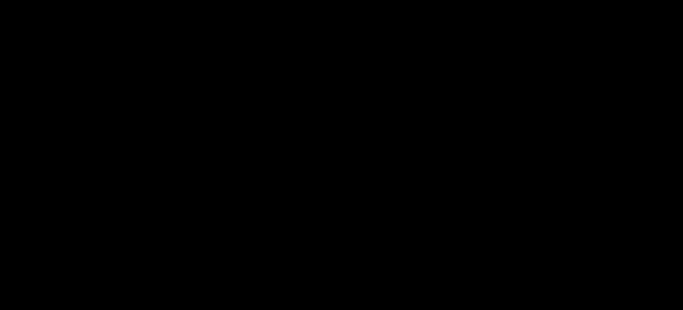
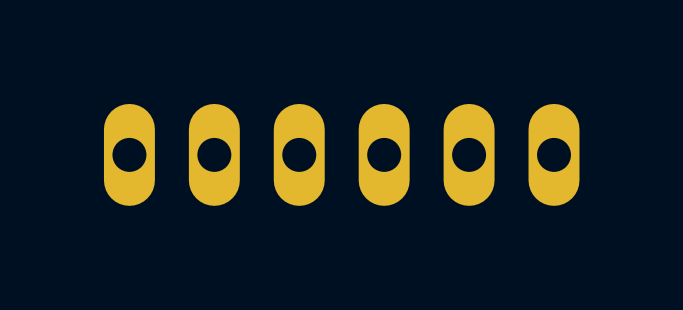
part: none -> (341, 154)

